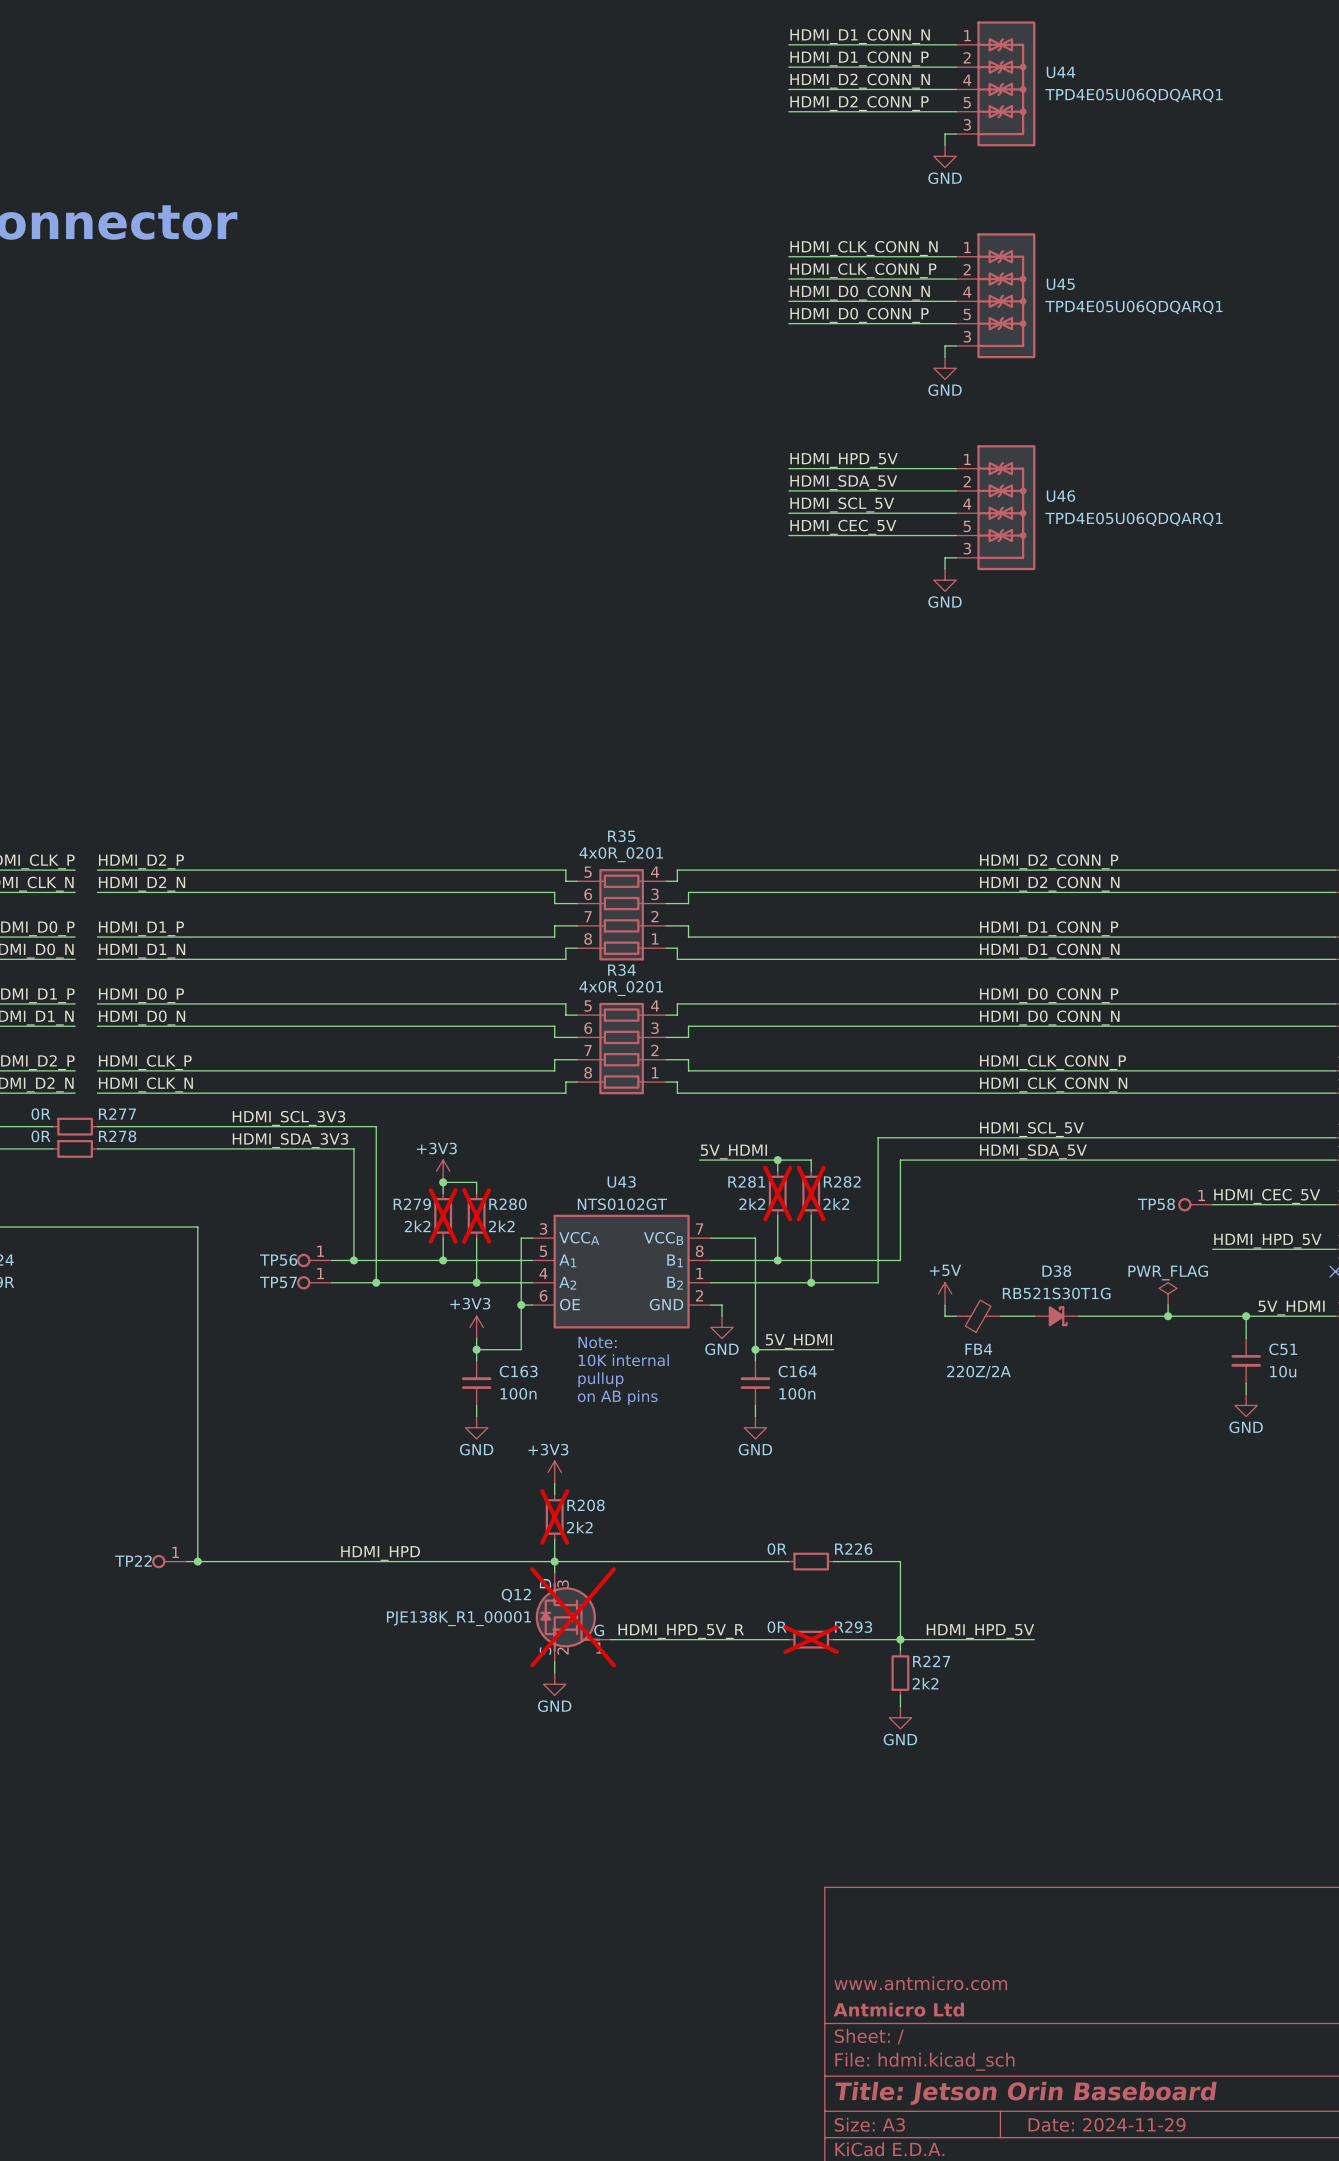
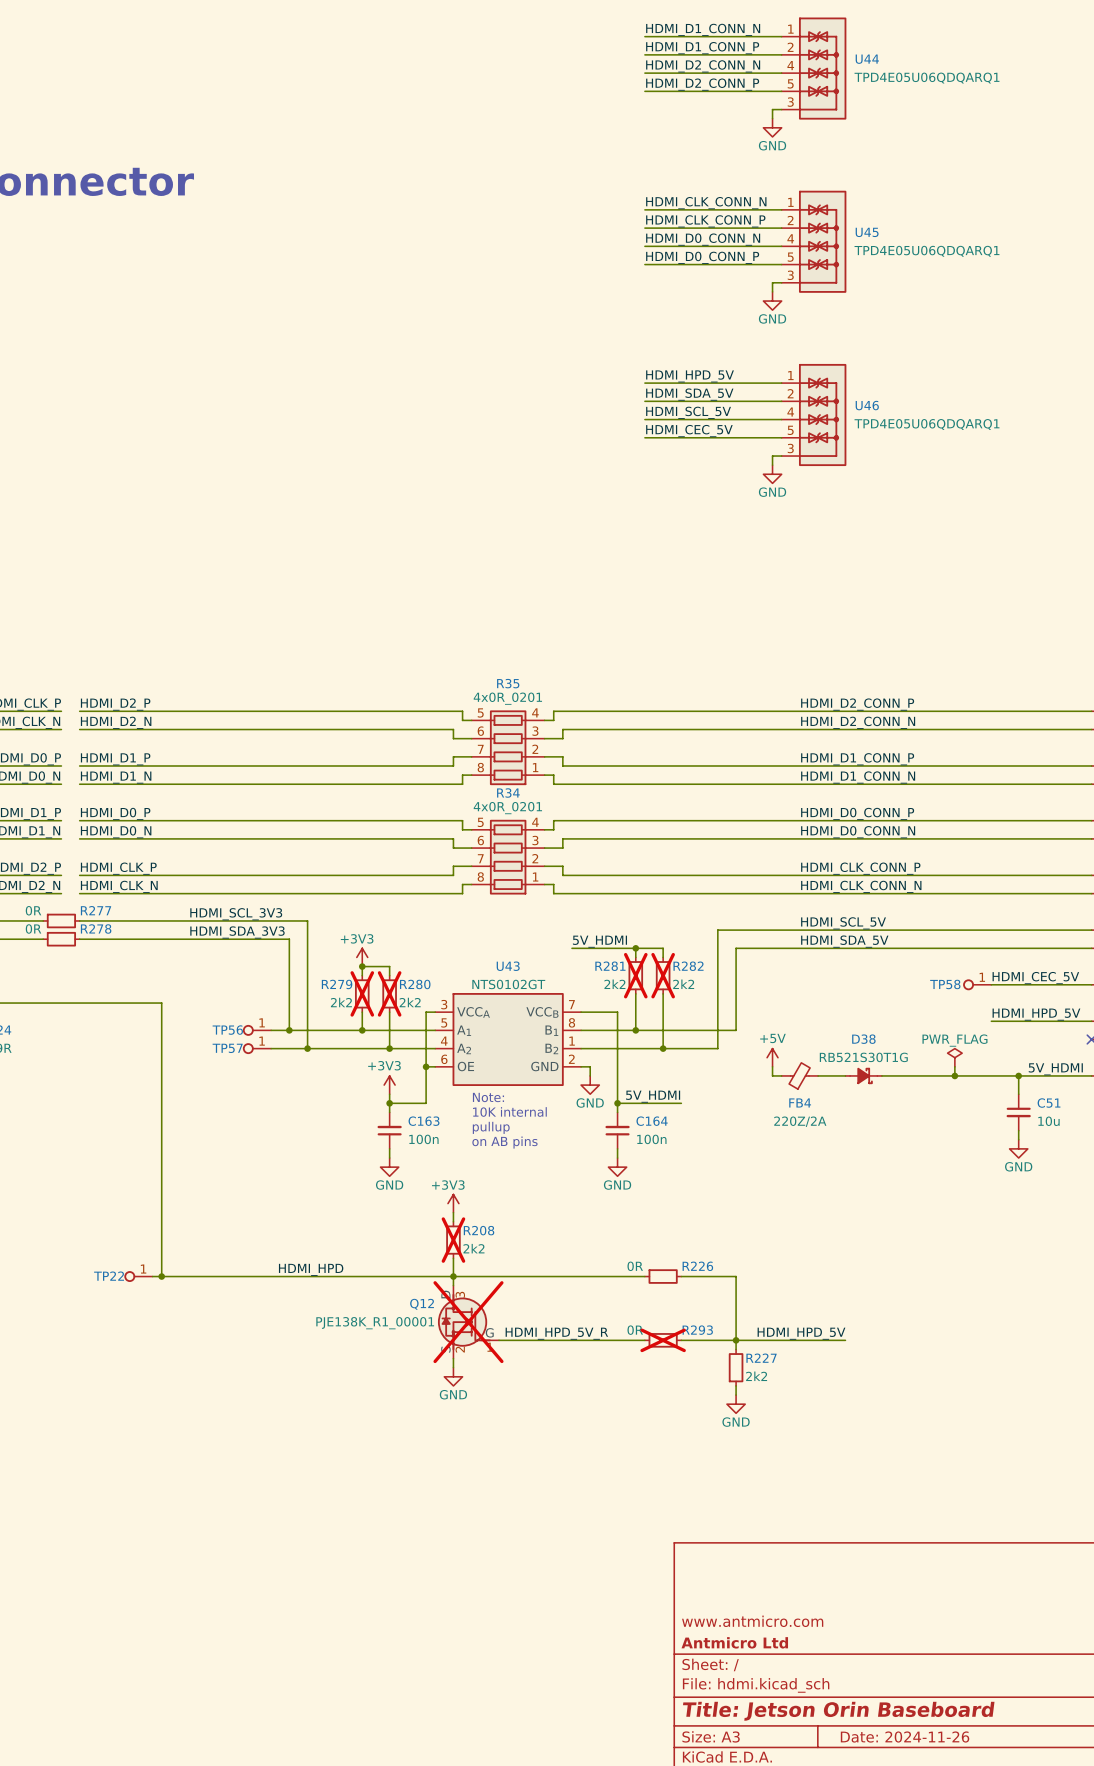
title block: Date: 2024-11-29 (1107, 2124) -> Date: 2024-11-26 (905, 1737)

